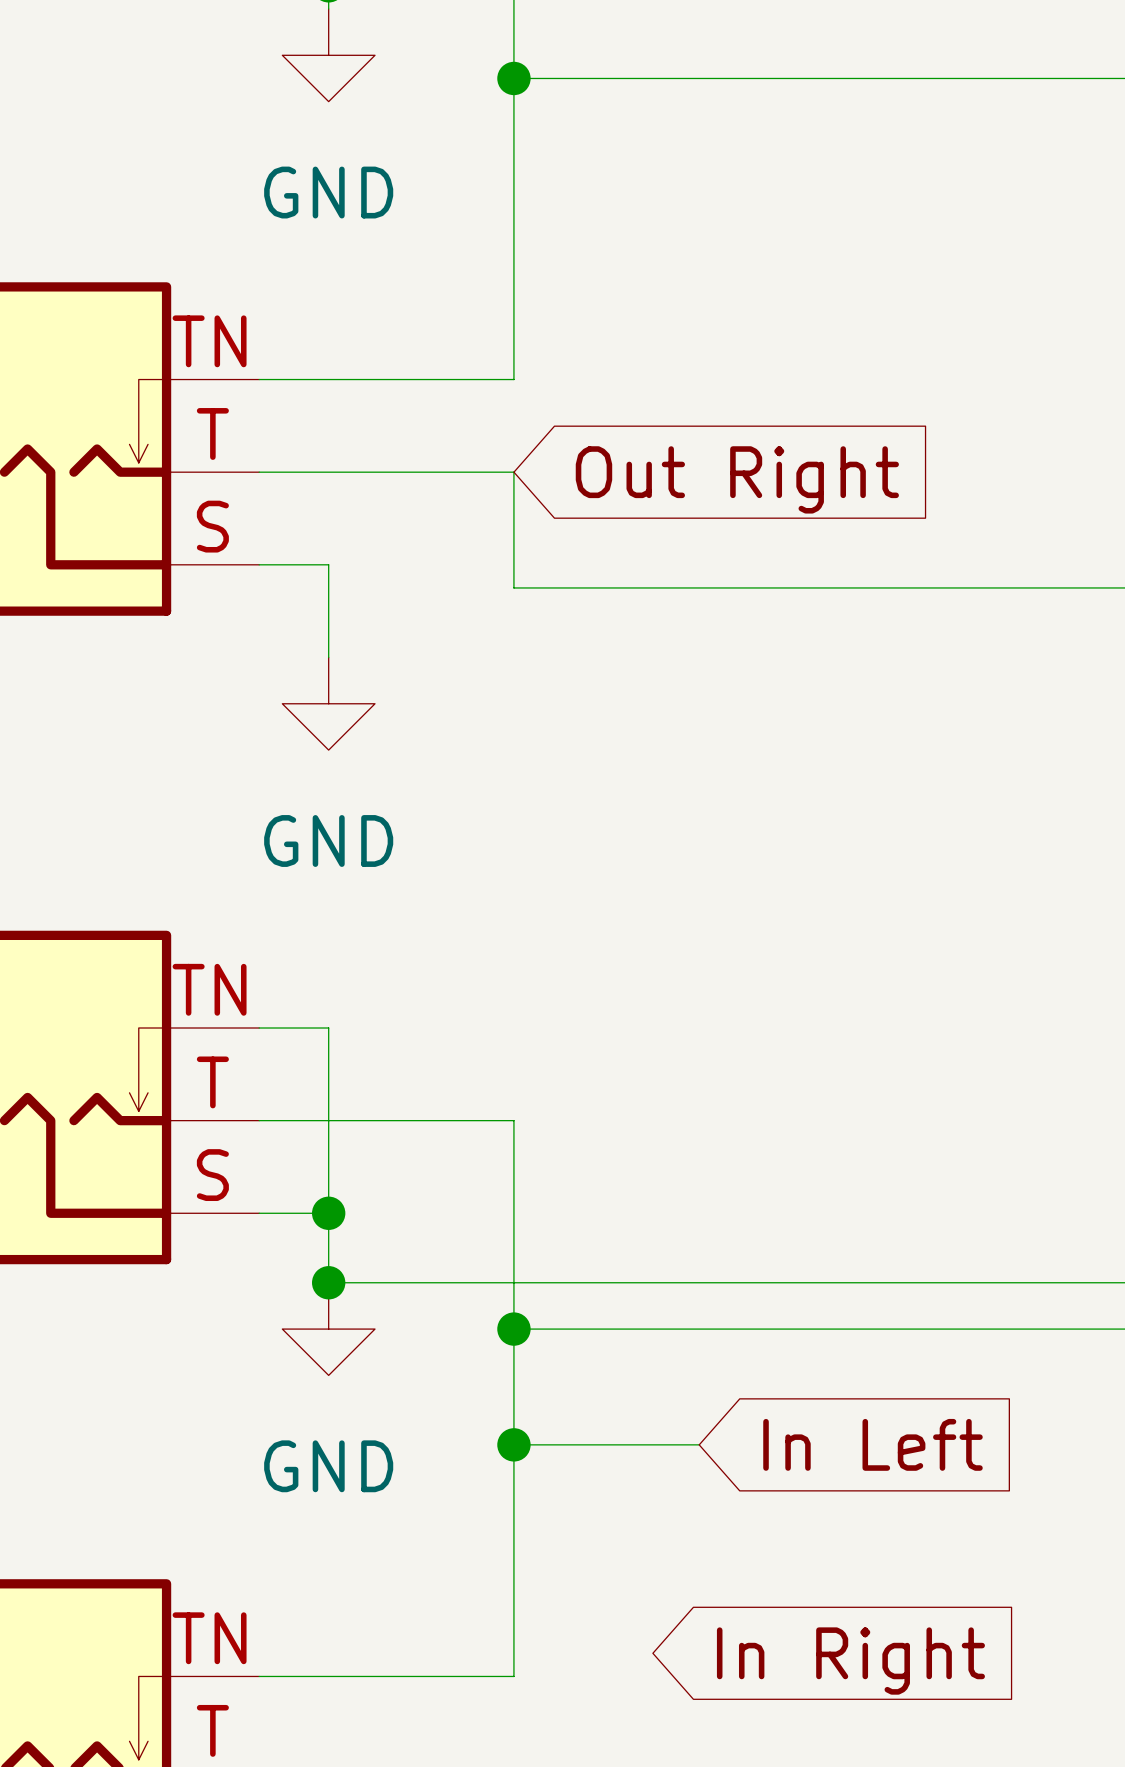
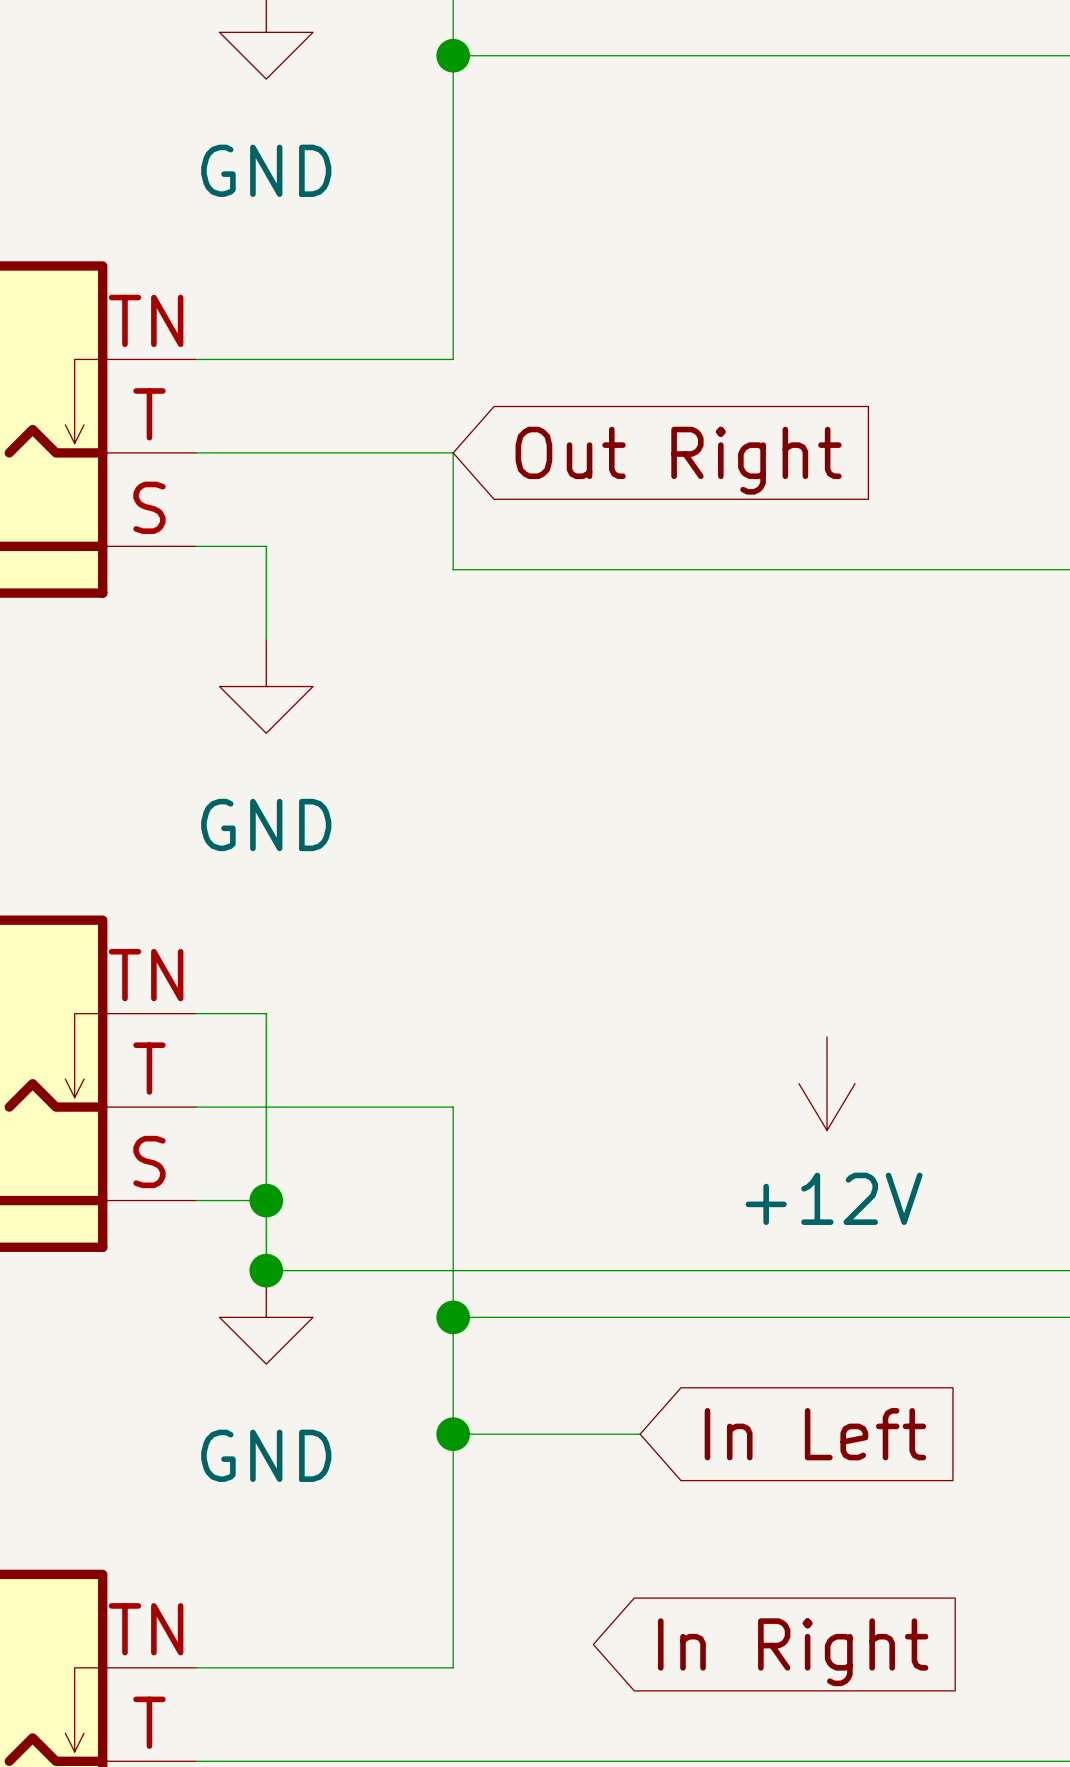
power symbol: none -> +12V (827, 1083)

